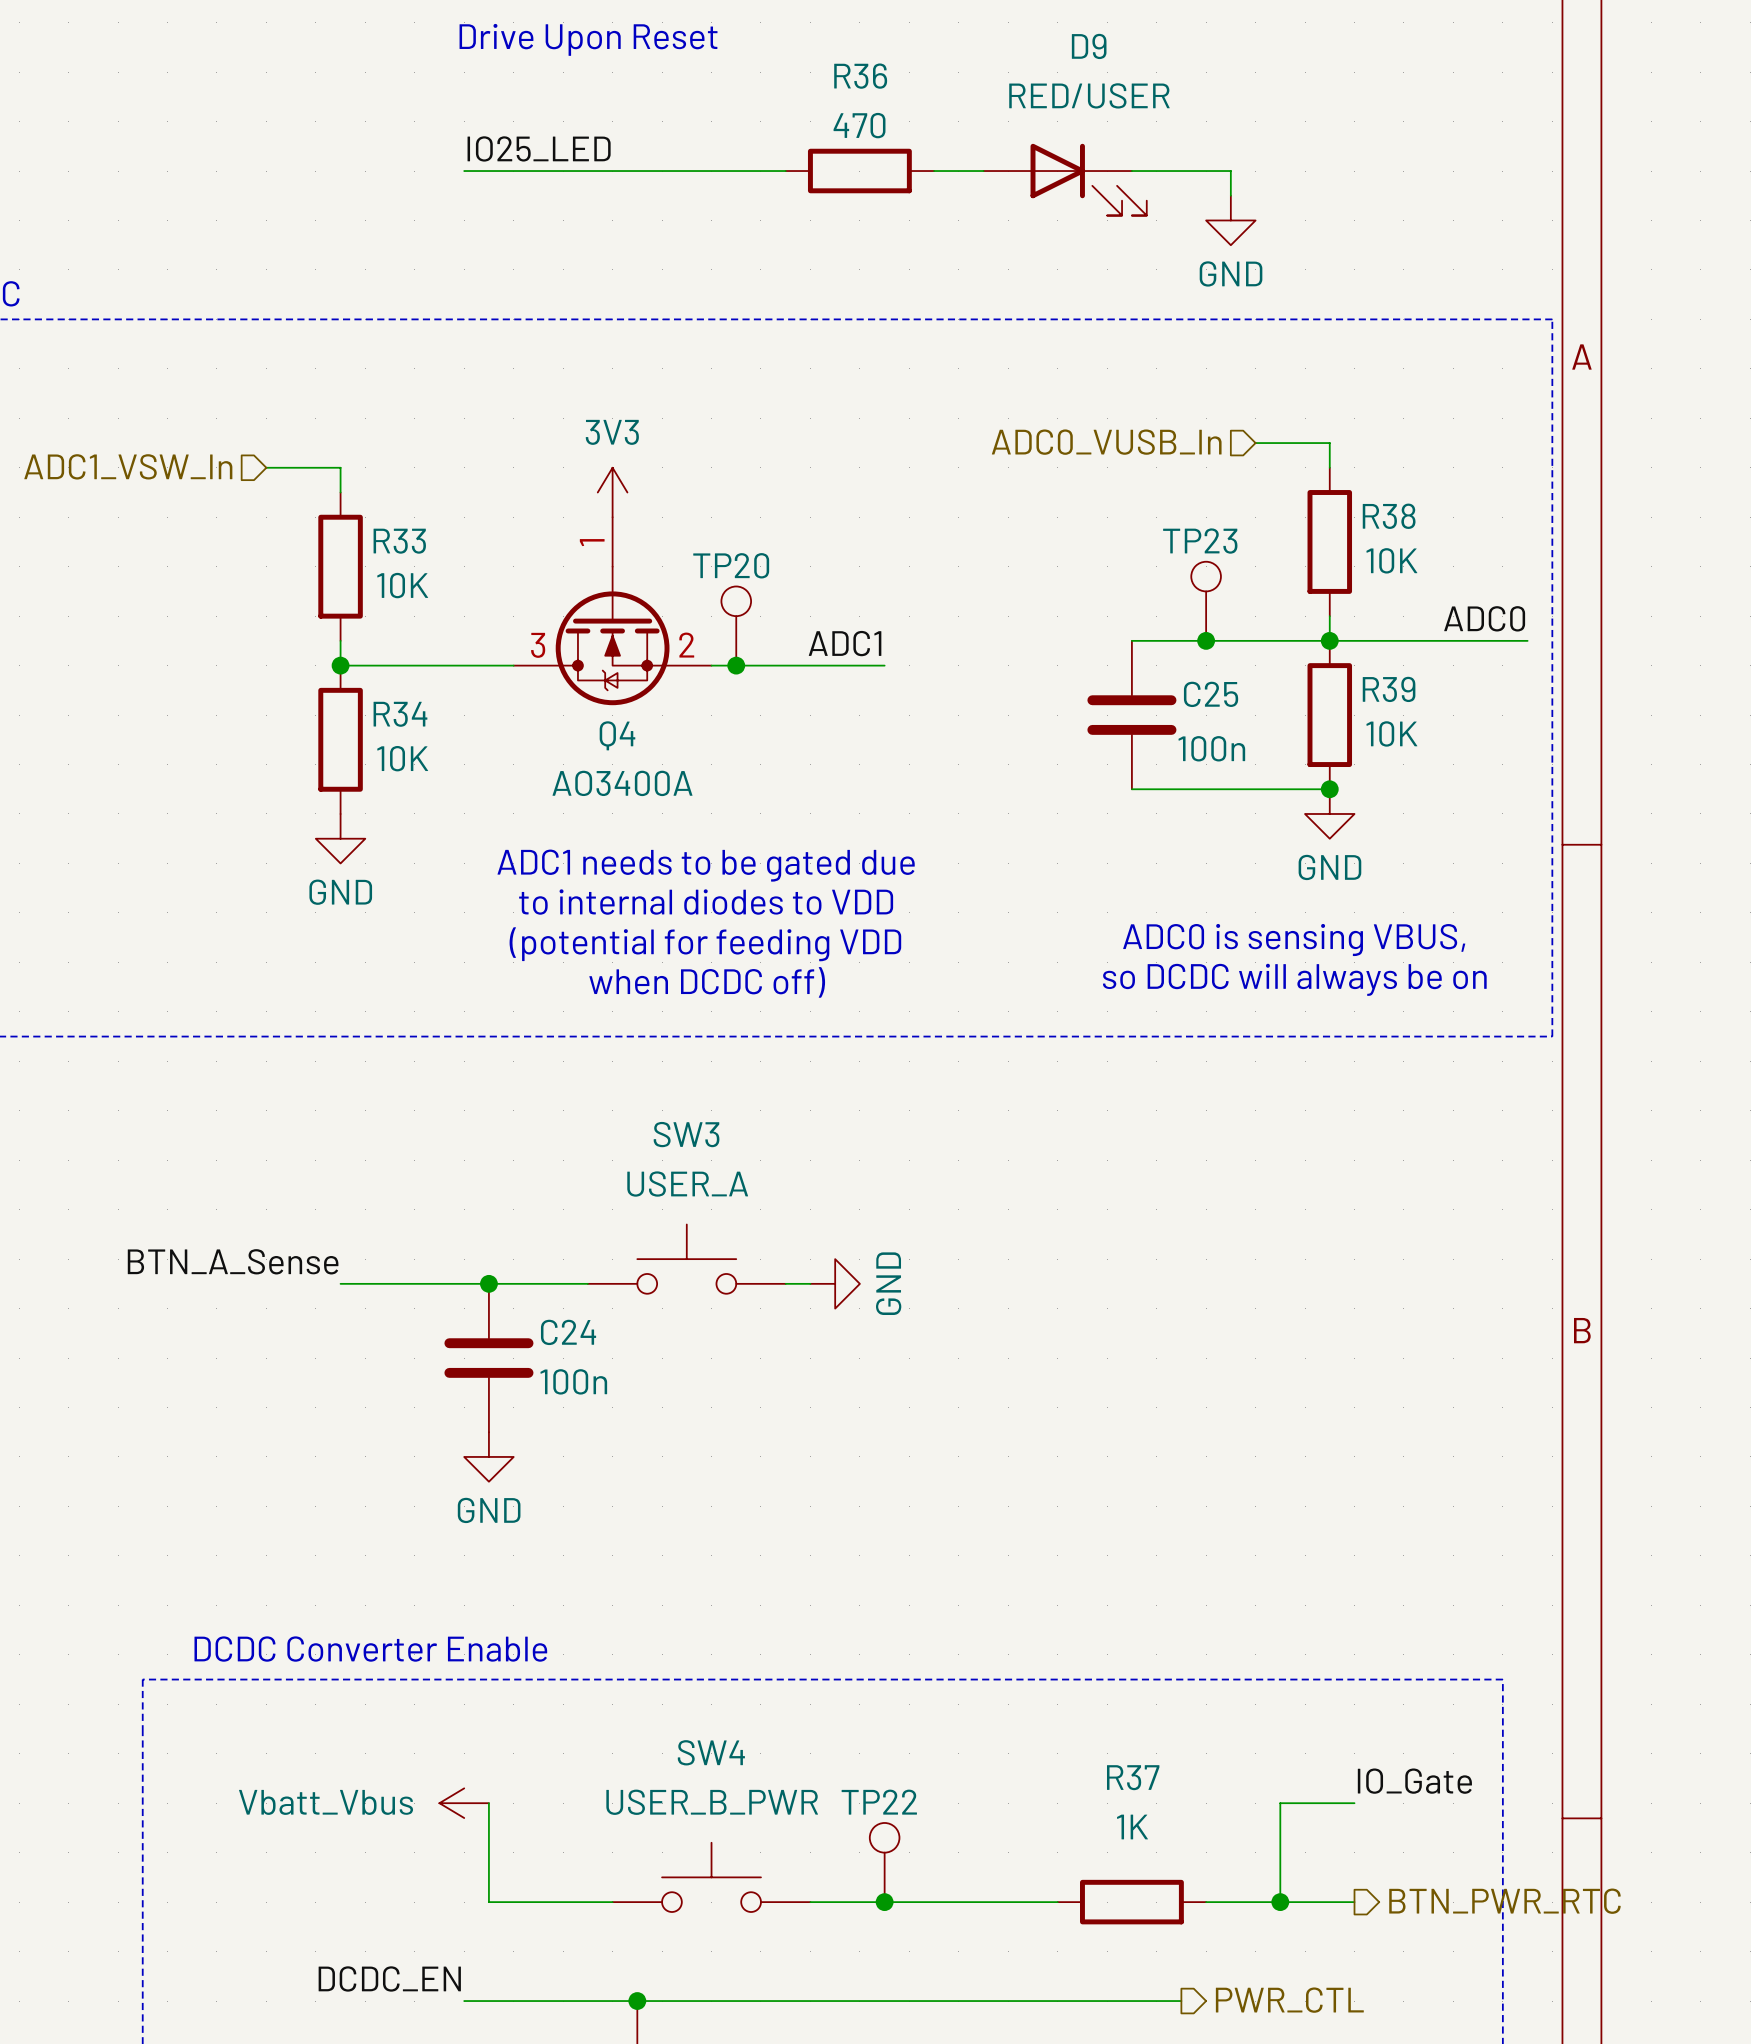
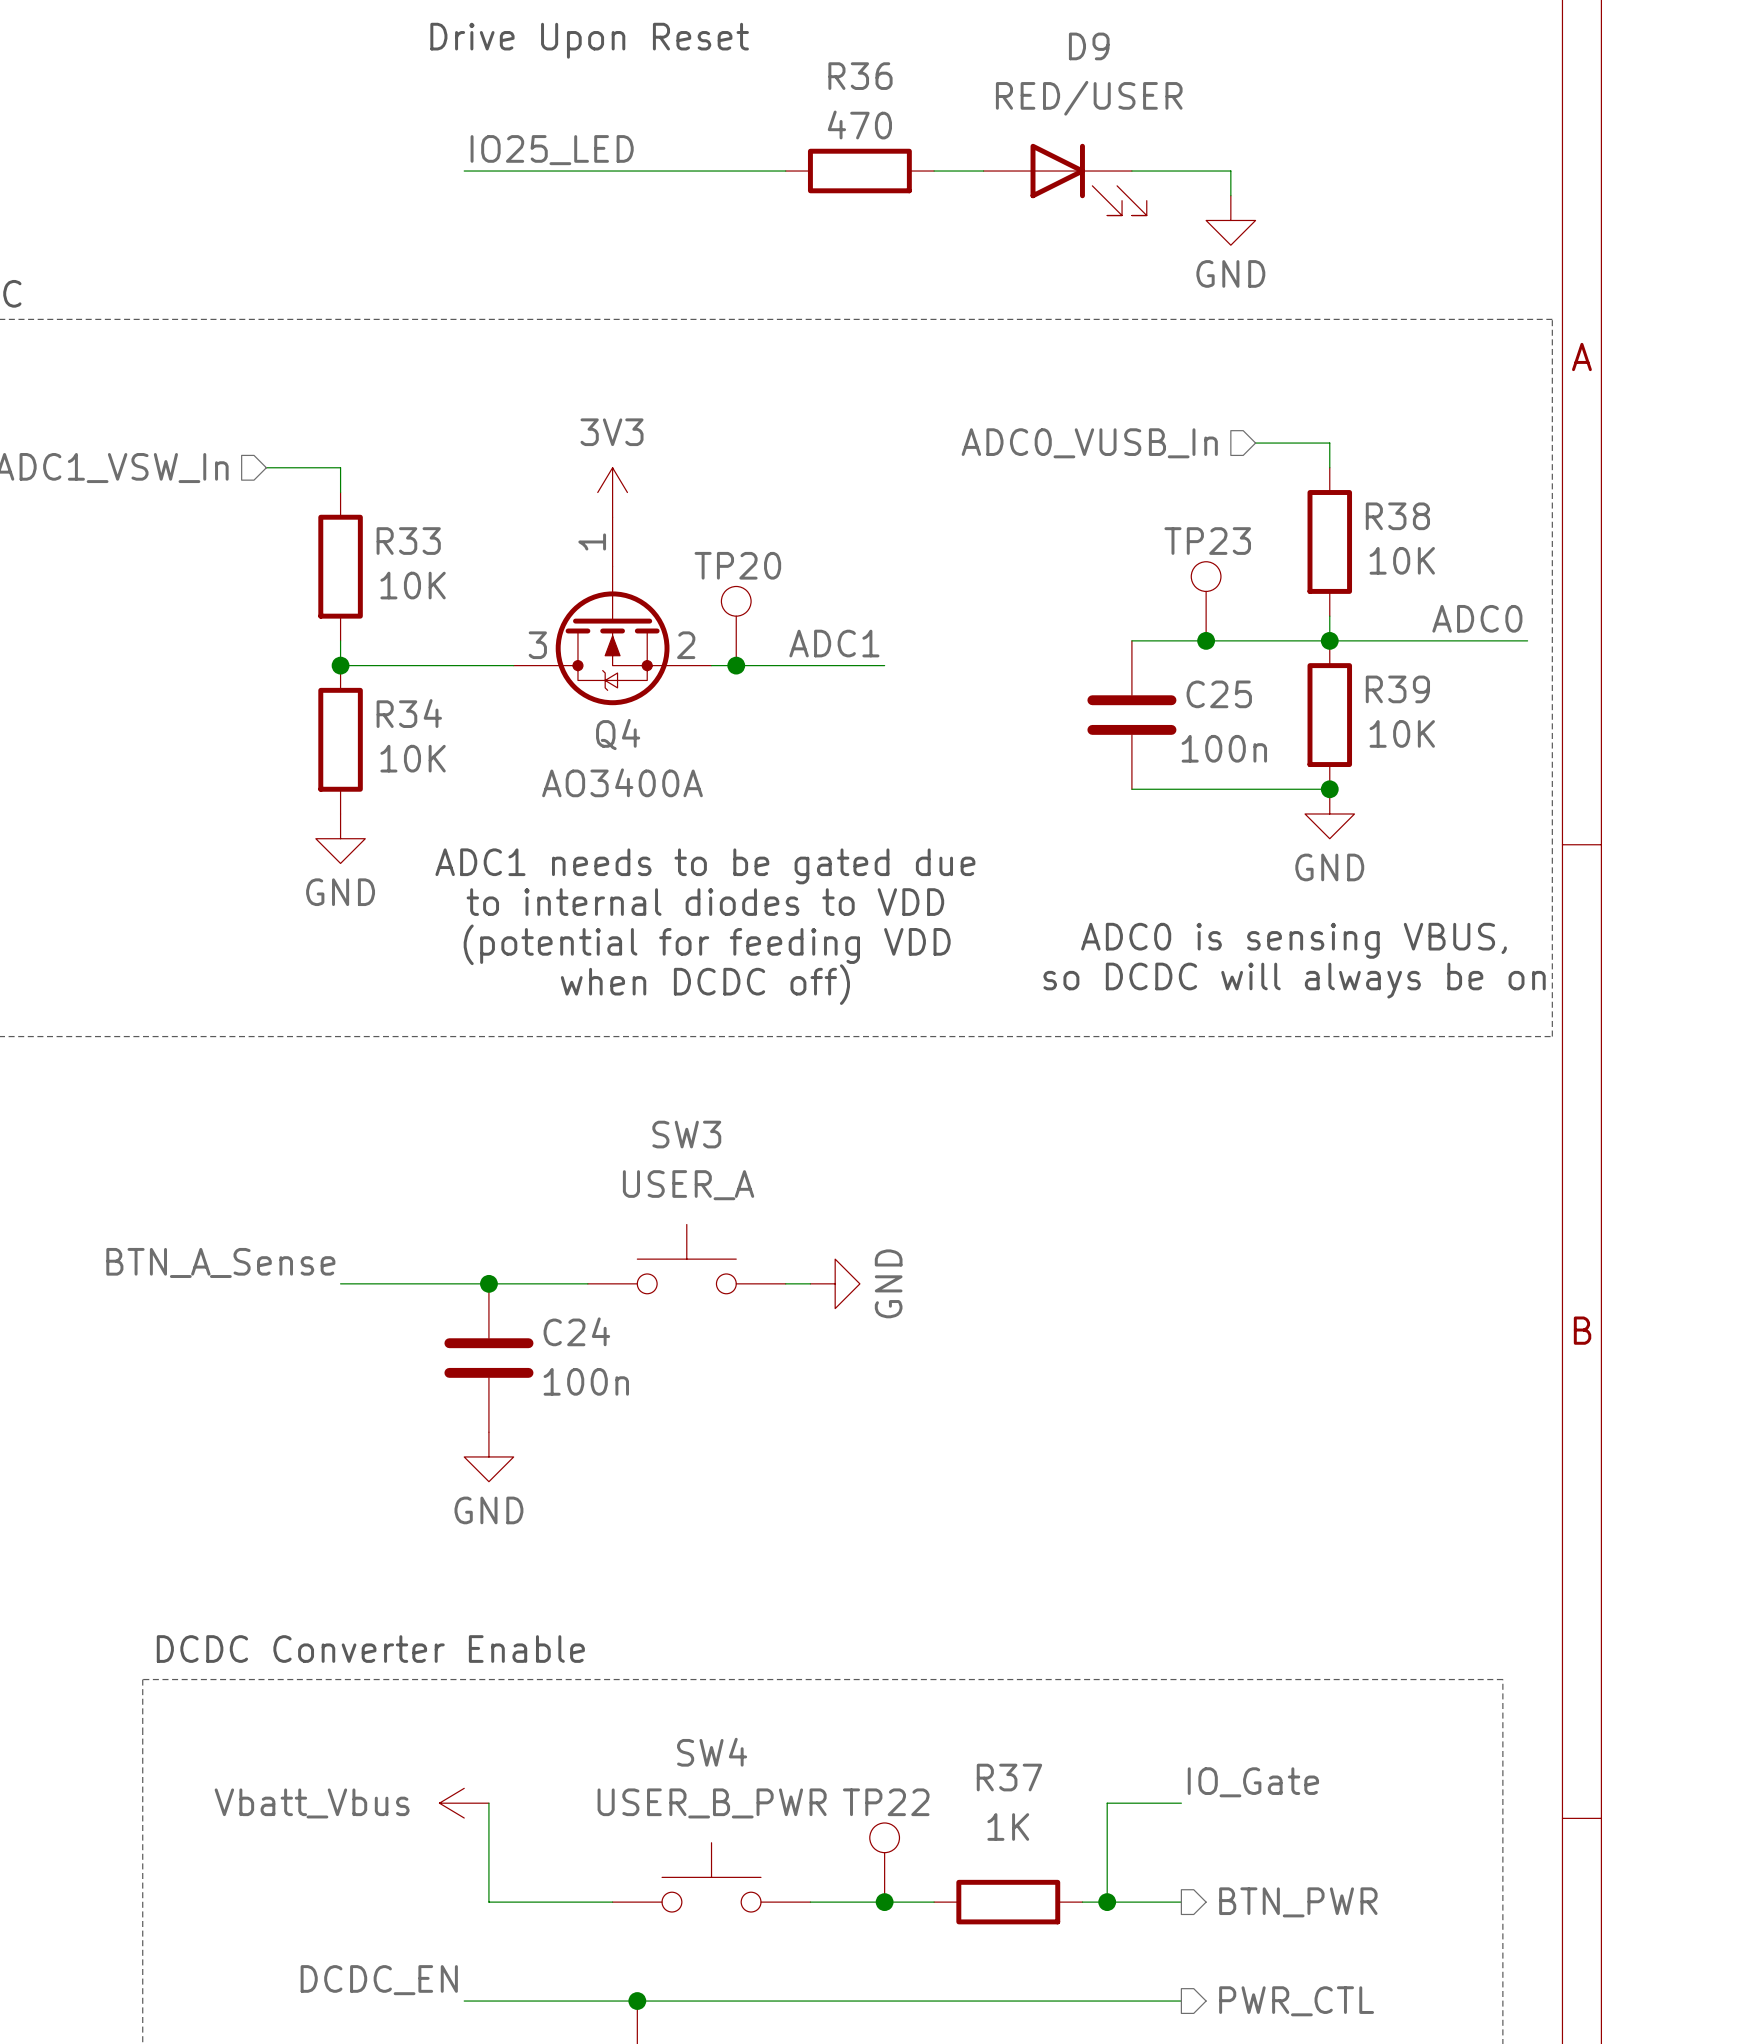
label position: IO_Gate (1414, 1781) -> IO_Gate (1253, 1782)
wire: (1354, 1803) (1280, 1803) (1280, 1902) -> (1181, 1803) (1107, 1803) (1107, 1902)
hierarchical label: BTN_PWR_RTC (1504, 1901) -> BTN_PWR (1298, 1902)
wire: (934, 1902) (1057, 1902) -> none
wire: none -> (1082, 1902) (1181, 1902)
junction: none -> (1107, 1902)
R37 position: (1131, 1902) -> (1008, 1902)
wire: (1206, 1902) (1354, 1902) -> none
junction: (1280, 1902) -> none

